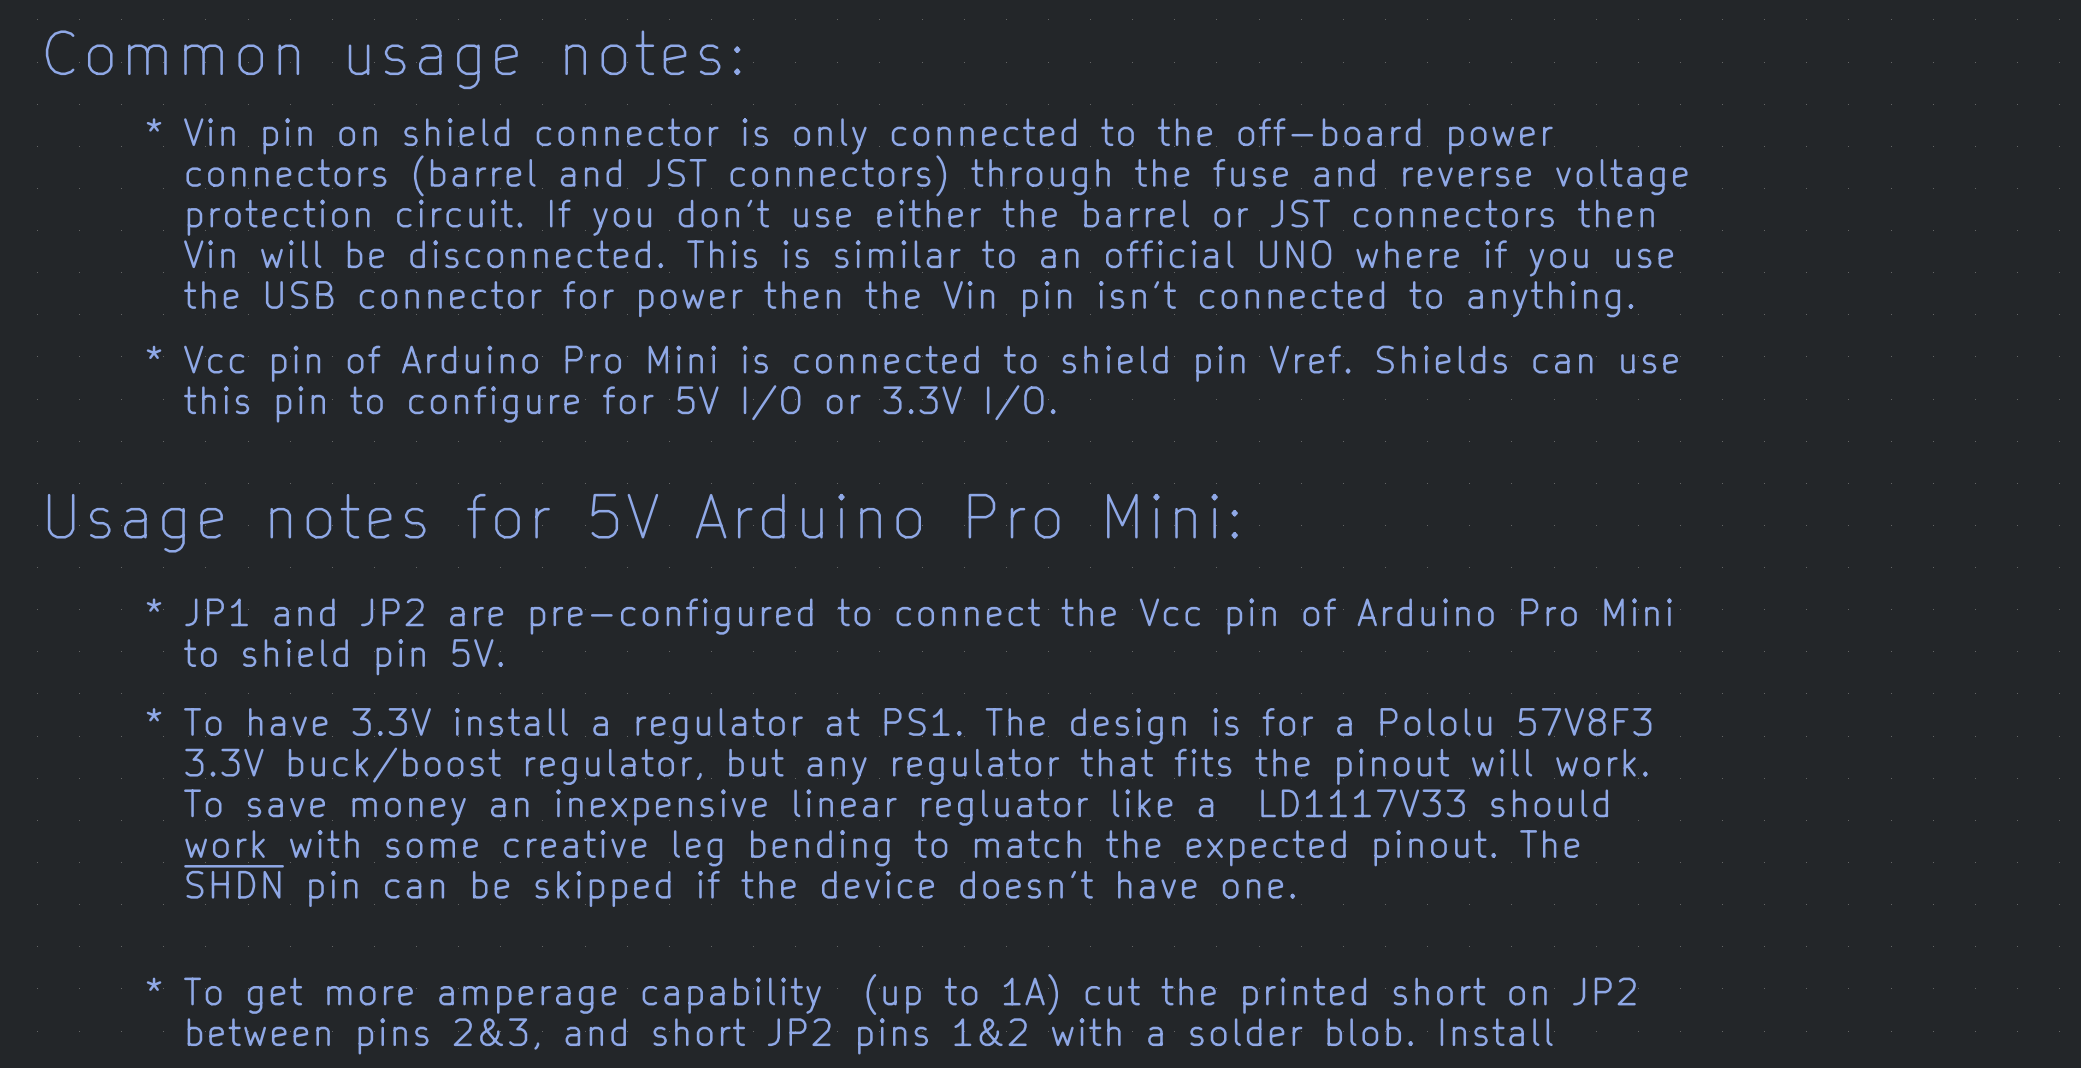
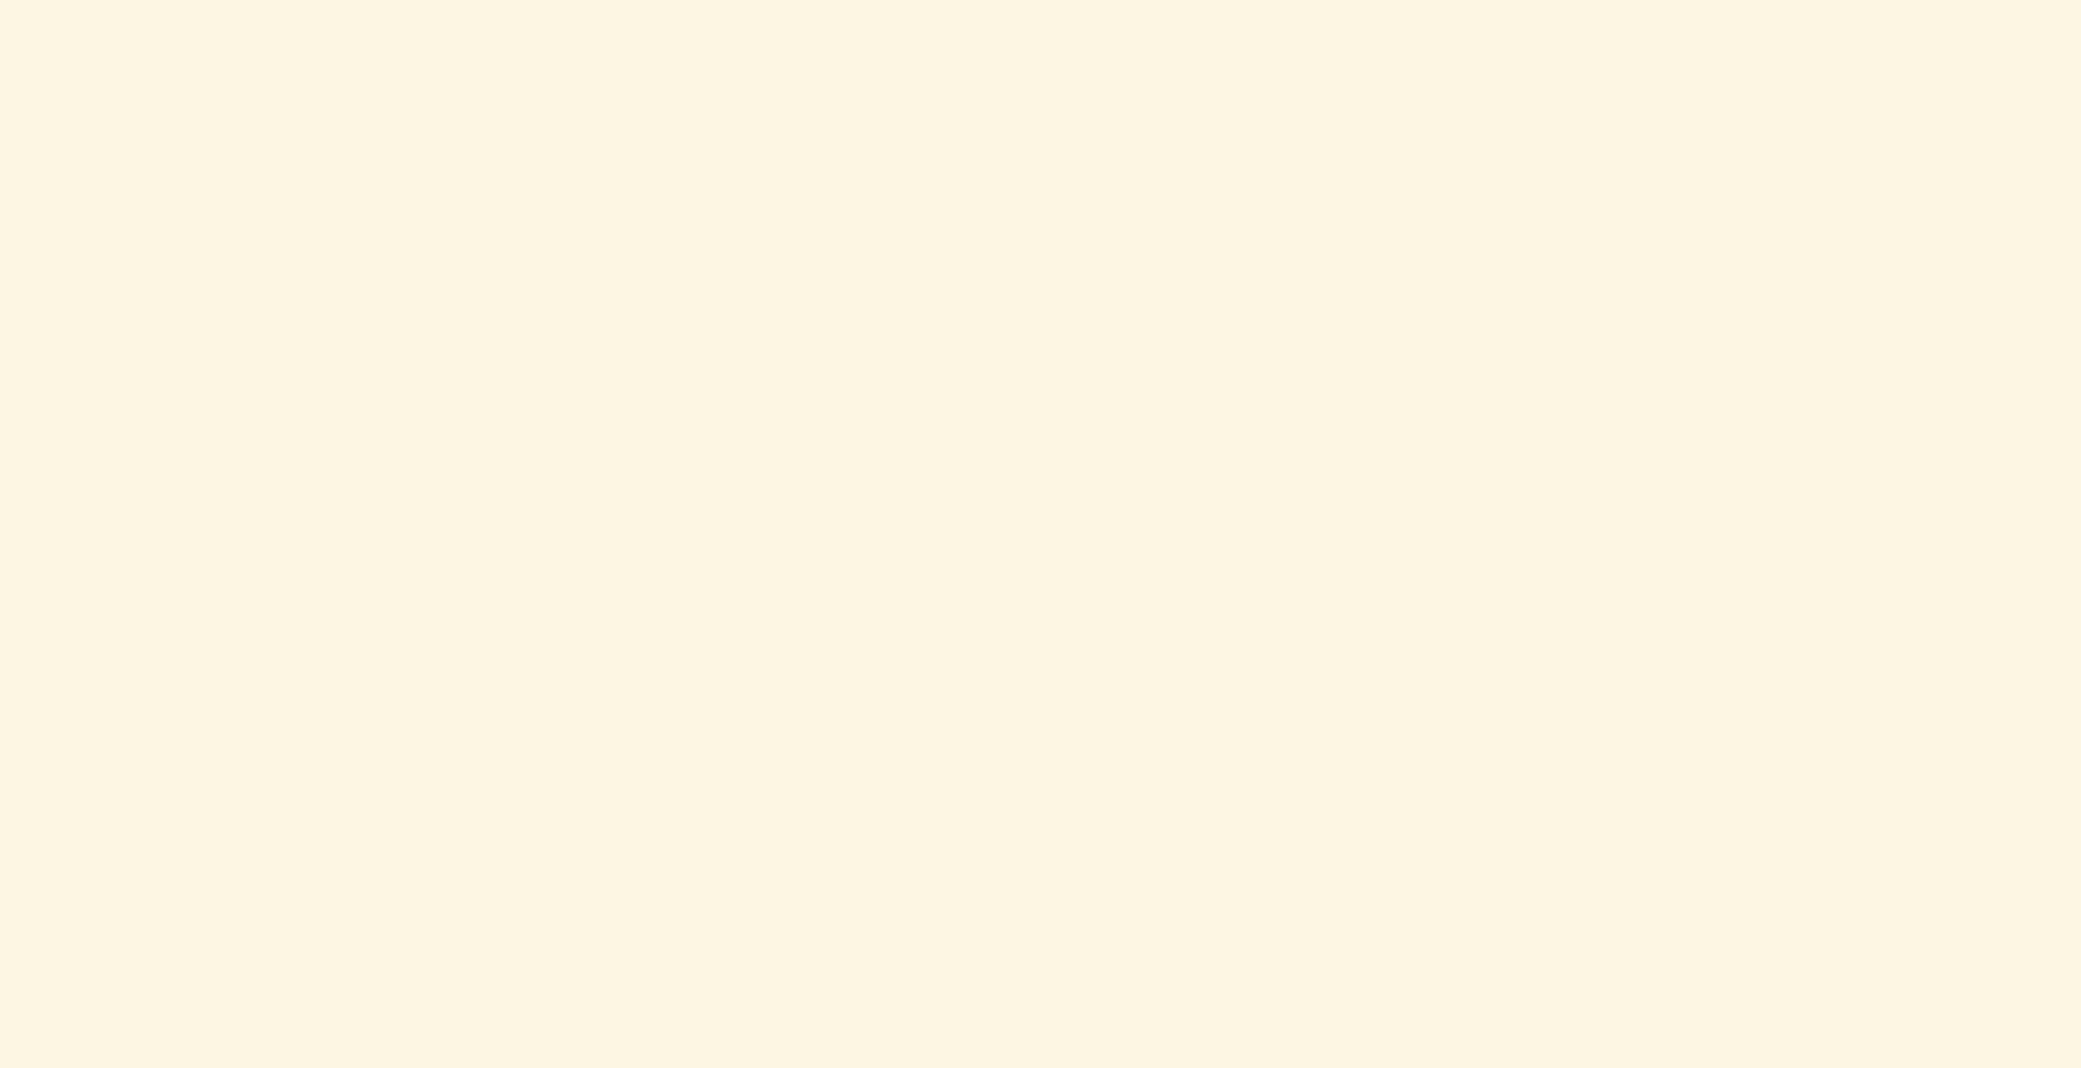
text: Common usage notes: (393, 59) -> none
text: * Vin pin on shield connector is only connected to the off-board power (849, 136) -> none
text: connectors (barrel and JST connectors) through the fuse and reverse voltage (937, 175) -> none
text: protection circuit. If you don't use either the barrel or JST connectors then (920, 217) -> none
text: Vin will be disconnected. This is similar to an official UNO where if you use (928, 258) -> none
text: the USB connector for power then the Vin pin isn't connected to anything. (908, 299) -> none
text: * Vcc pin of Arduino Pro Mini is connected to shield pin Vref. Shields can use (912, 363) -> none
text: this pin to configure for 5V I/O or 3.3V I/O. (619, 403) -> none
text: Usage notes for 5V Arduino Pro Mini: (642, 523) -> none
text: * JP1 and JP2 are pre-configured to connect the Vcc pin of Arduino Pro Mini (909, 616) -> none
text: to shield pin 5V. (343, 657) -> none
text: * To have 3.3V install a regulator at PS1. The design is for a Pololu 57V8F3 (899, 726) -> none
text: 3.3V buck/boost regulator, but any regulator that fits the pinout will work. (916, 766) -> none
text: To save money an inexpensive linear regluator like a LD1117V33 should (896, 807) -> none
text: work with some creative leg bending to match the expected pinout. The (882, 848) -> none
text: ~{SHDN} pin can be skipped if the device doesn't have one. (739, 886) -> none
text: * To get more amperage capability (up to 1A) cut the printed short on JP2 (891, 994) -> none
text: between pins 2&3, and short JP2 pins 1&2 with a solder blob. Install (870, 1036) -> none

